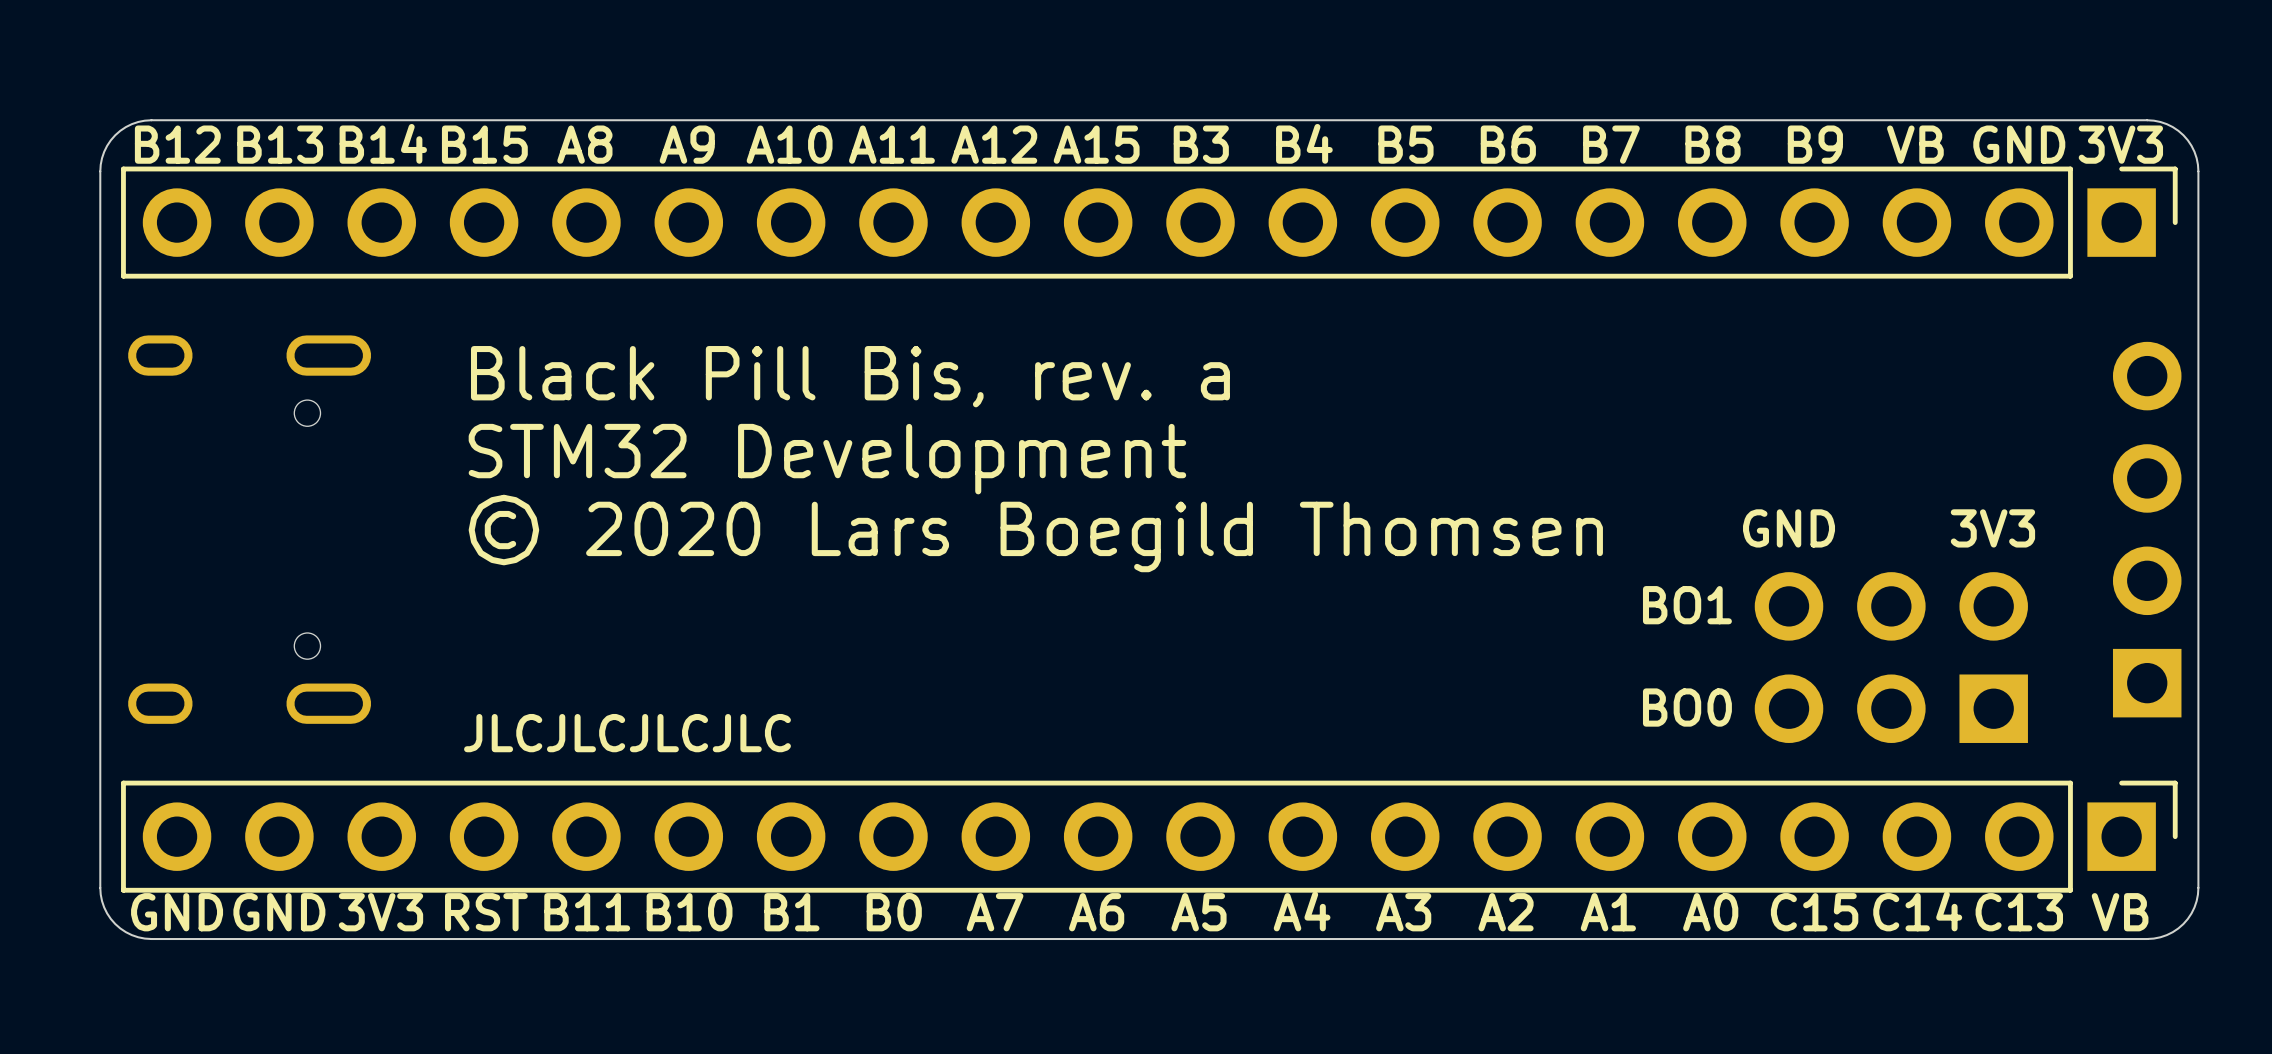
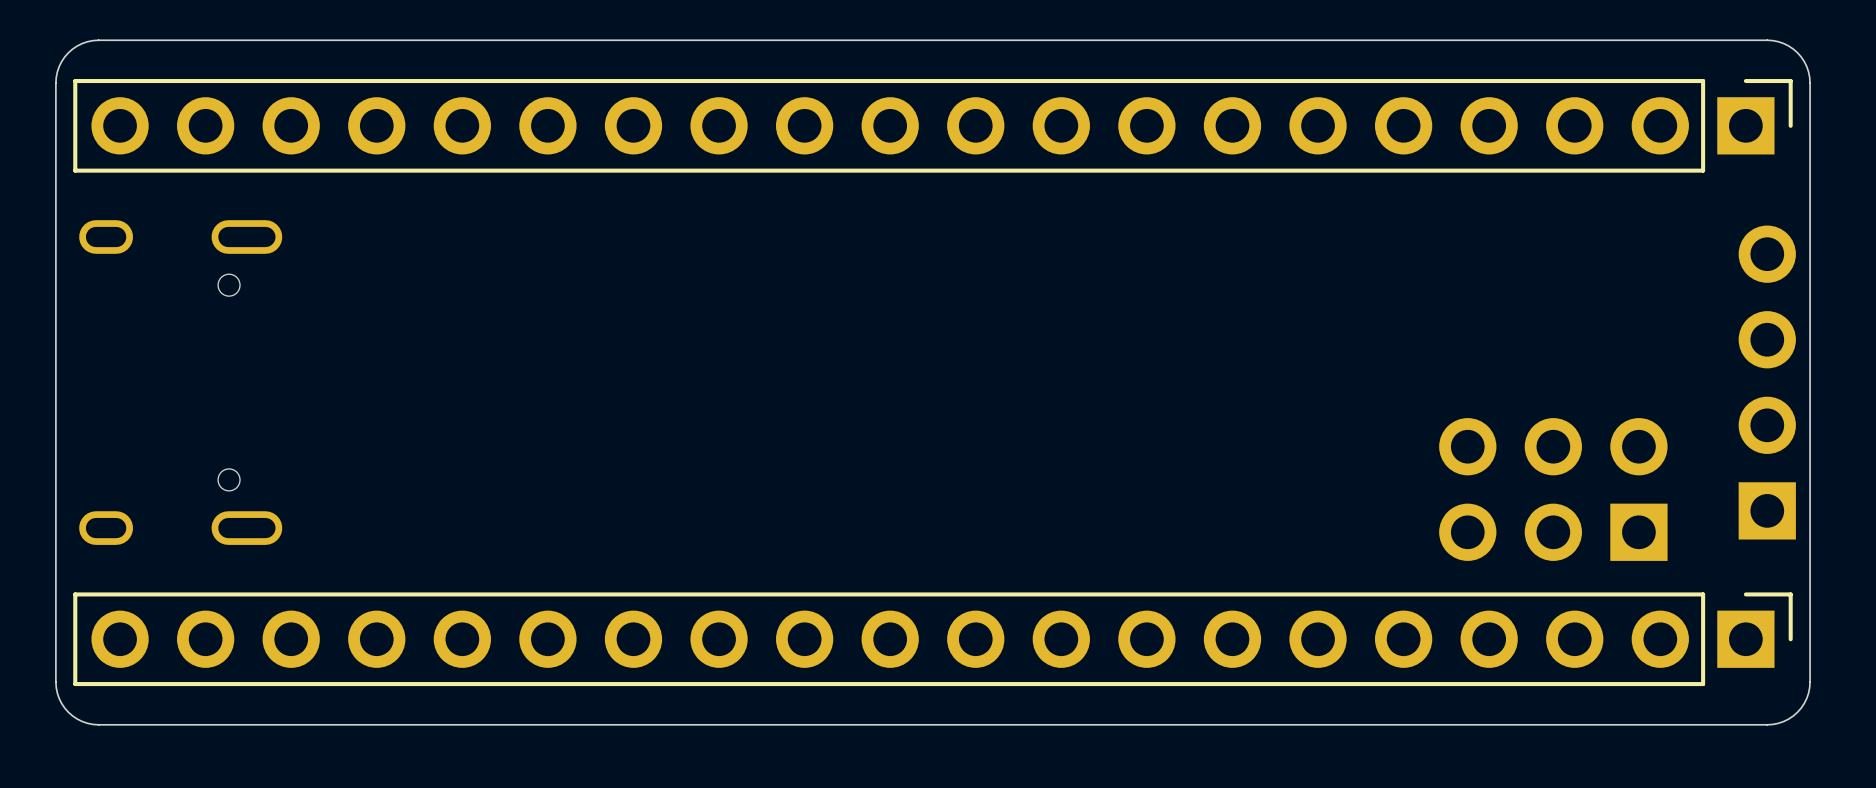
text: B14 (383, 143) -> none
text: B4 (1304, 143) -> none
text: B12 (177, 144) -> none
text: B13 (280, 144) -> none
text: B15 (484, 144) -> none
text: A8 (584, 144) -> none
text: A9 (687, 144) -> none
text: A10 (789, 144) -> none
text: A11 (891, 144) -> none
text: A12 (994, 144) -> none
text: A15 (1096, 144) -> none
text: B3 (1201, 144) -> none
text: B5 (1405, 144) -> none
text: B6 (1508, 144) -> none
text: B7 (1611, 144) -> none
text: B8 (1713, 144) -> none
text: B9 (1815, 144) -> none
text: VB (1915, 144) -> none
text: GND (2019, 144) -> none
text: 3V3 (2120, 144) -> none
text: Black Pill Bis, rev. a (850, 376) -> none
text: STM32 Development (827, 459) -> none
text: GND (1789, 528) -> none
text: 3V3 (1992, 528) -> none
text: © 2020 Lars Boegild Thomsen (1035, 533) -> none
text: BO1 (1687, 605) -> none
text: BO0 (1687, 707) -> none
text: JLCJLCJLCJLC (627, 733) -> none
text: A4 (1302, 911) -> none
text: C14 (1917, 911) -> none
text: GND (177, 912) -> none
text: GND (279, 912) -> none
text: 3V3 (380, 912) -> none
text: RST (486, 912) -> none
text: B11 (587, 912) -> none
text: B10 (689, 912) -> none
text: B1 (791, 912) -> none
text: B0 (894, 912) -> none
text: A7 (995, 912) -> none
text: A6 (1096, 912) -> none
text: A5 (1198, 912) -> none
text: A3 (1403, 912) -> none
text: A2 (1506, 912) -> none
text: A1 (1608, 912) -> none
text: A0 (1710, 912) -> none
text: C15 (1814, 912) -> none
text: C13 (2019, 912) -> none
text: VB (2120, 912) -> none

